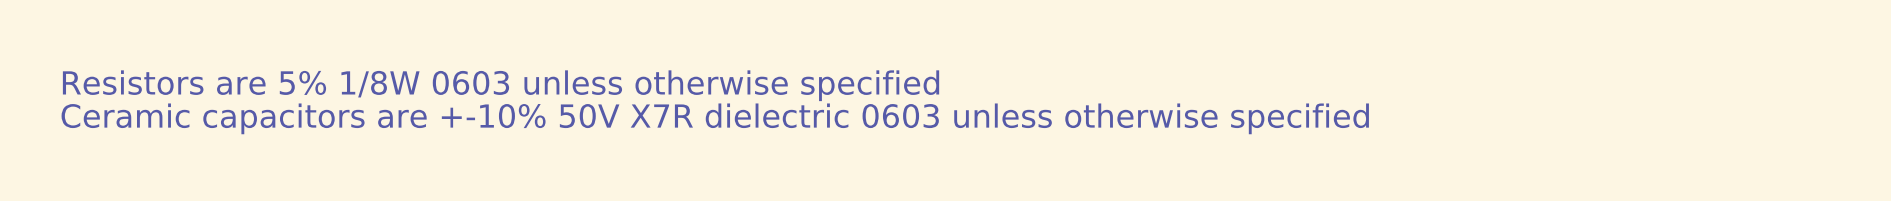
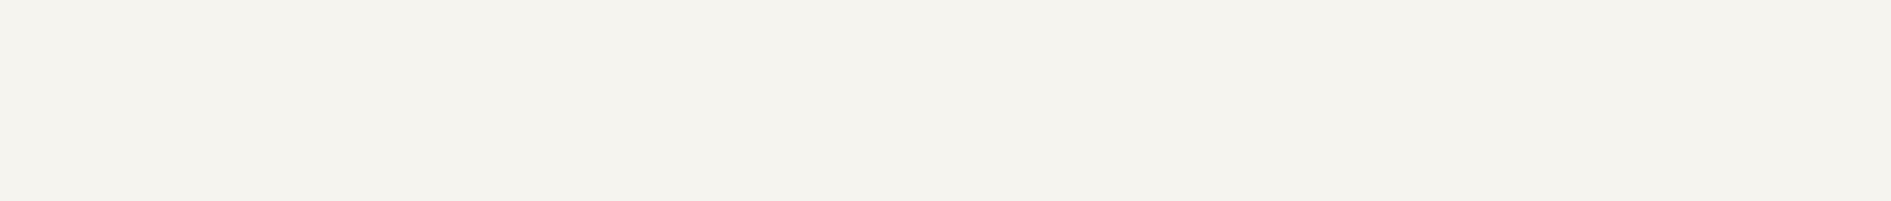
text: Resistors are 5% 1/8W 0603 unless otherwise specified (501, 85) -> none
text: Ceramic capacitors are +-10% 50V X7R dielectric 0603 unless otherwise specified (715, 118) -> none

